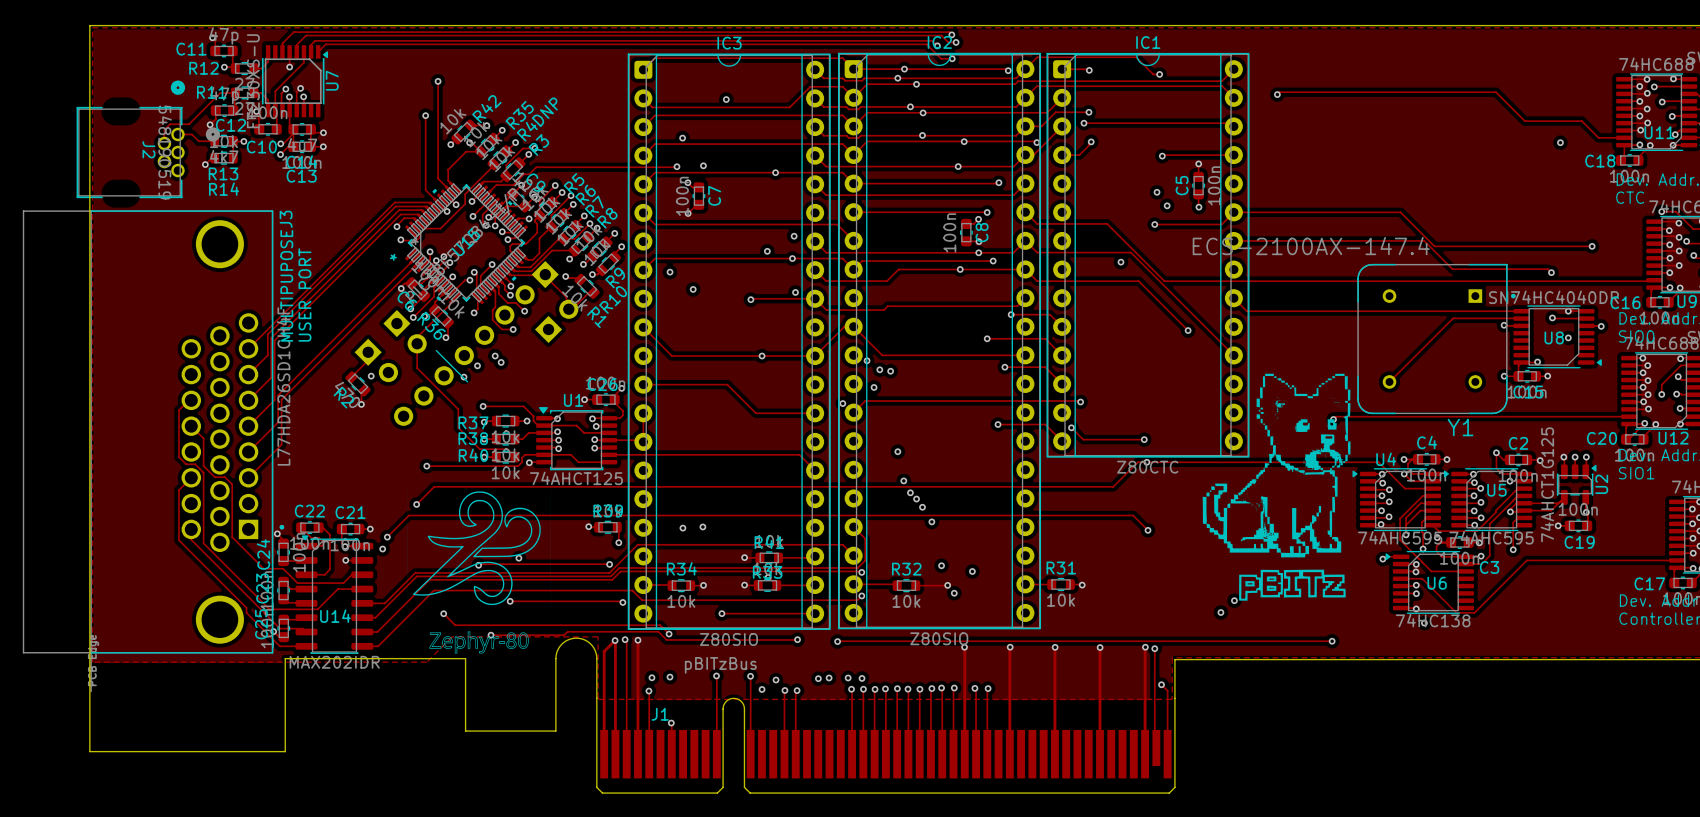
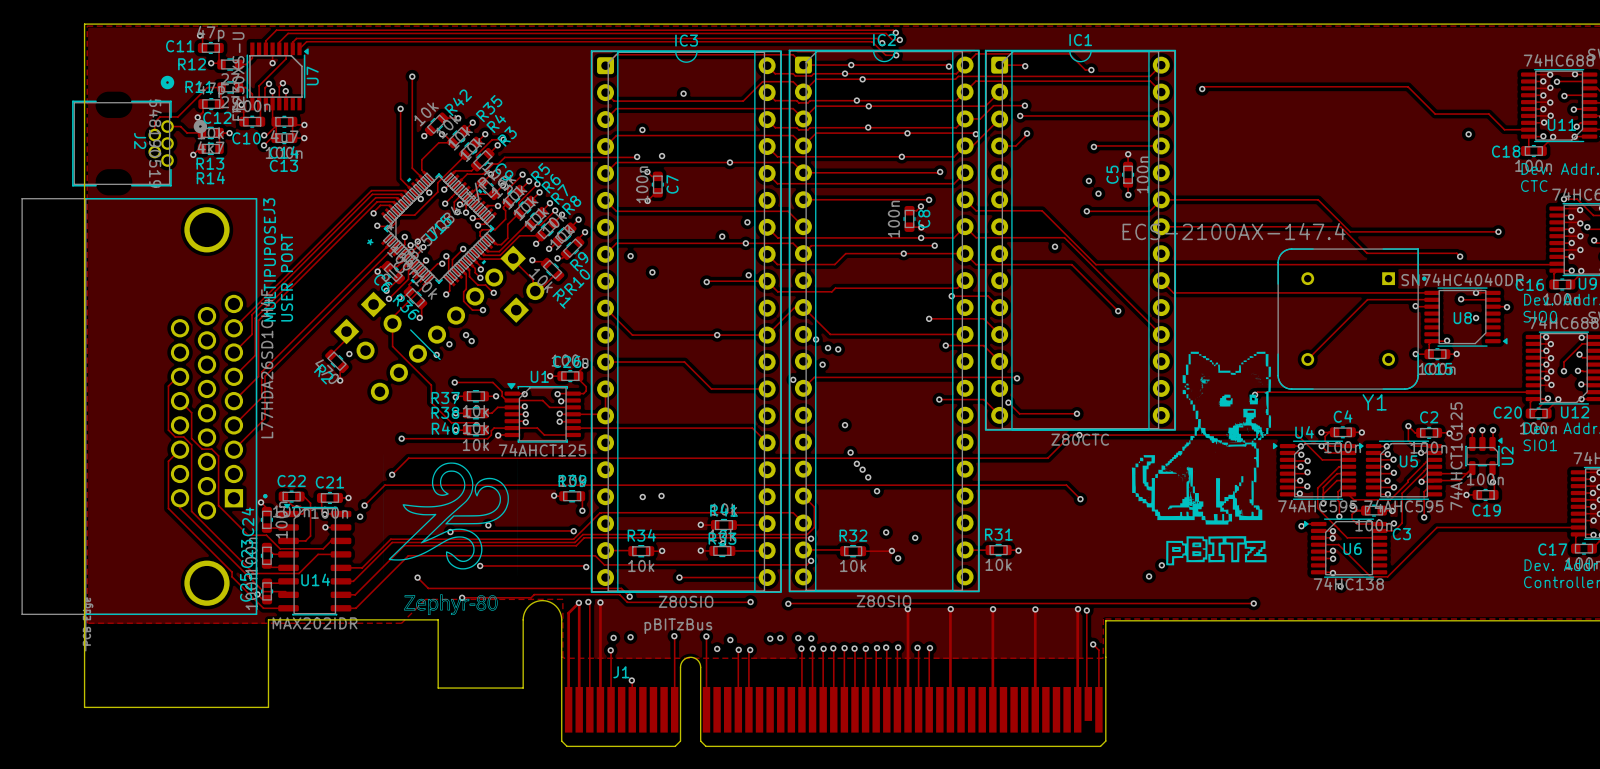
text: DNP (544, 112) -> none

